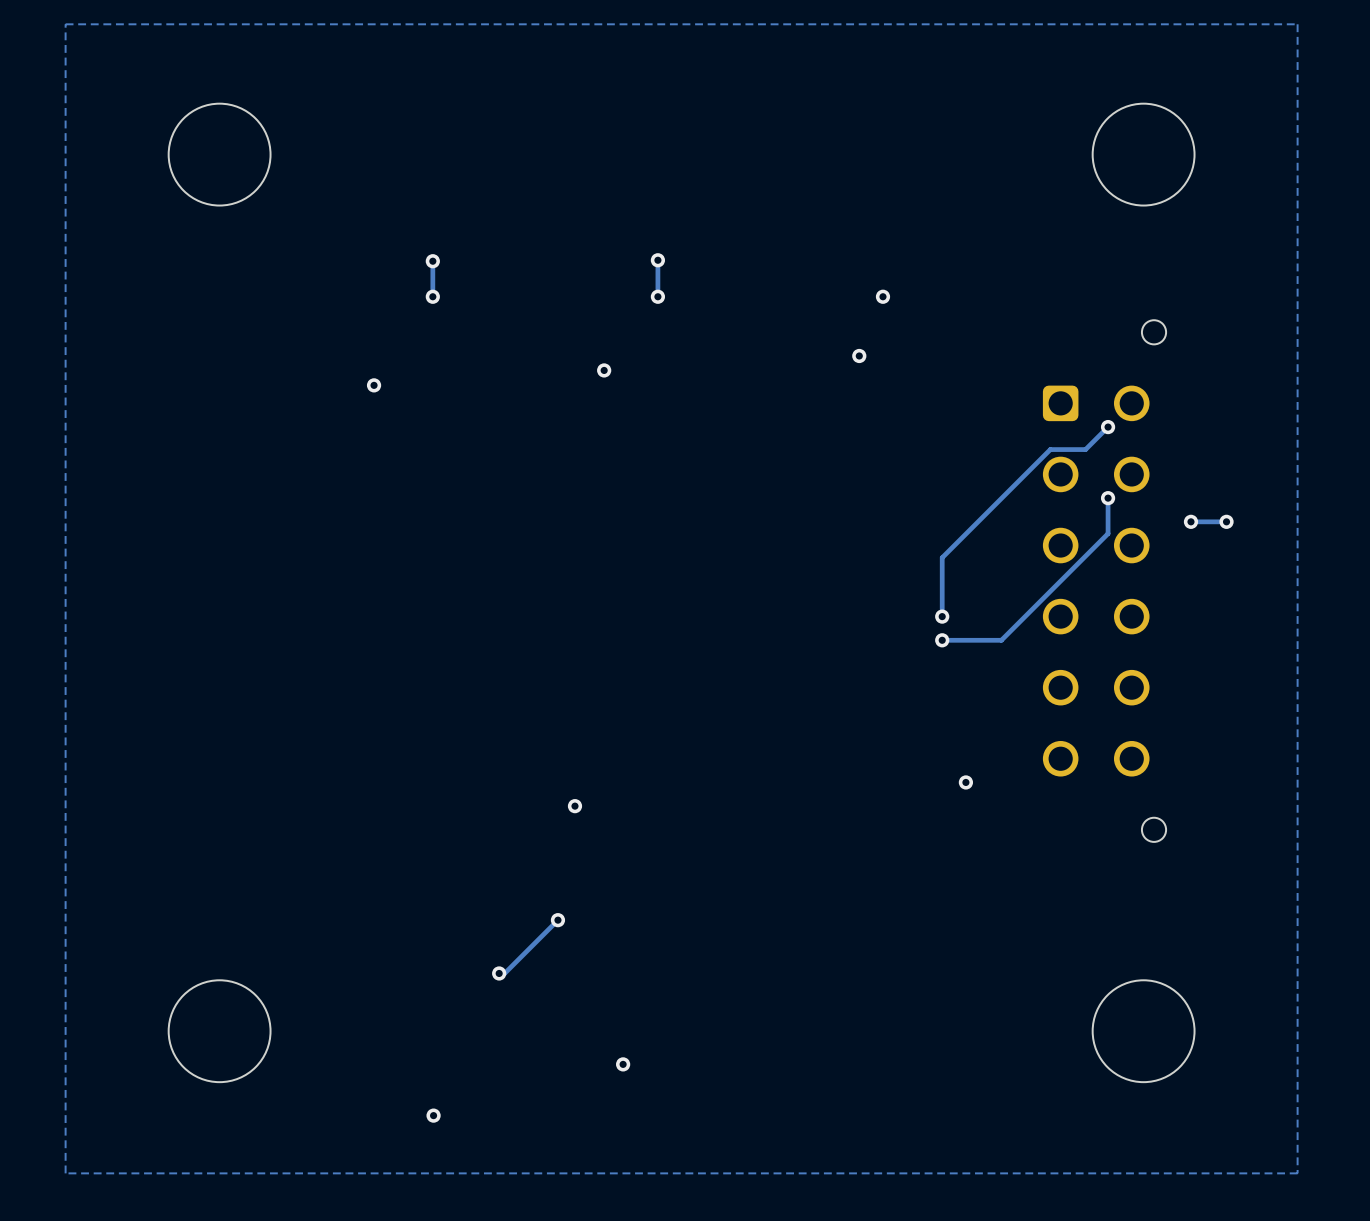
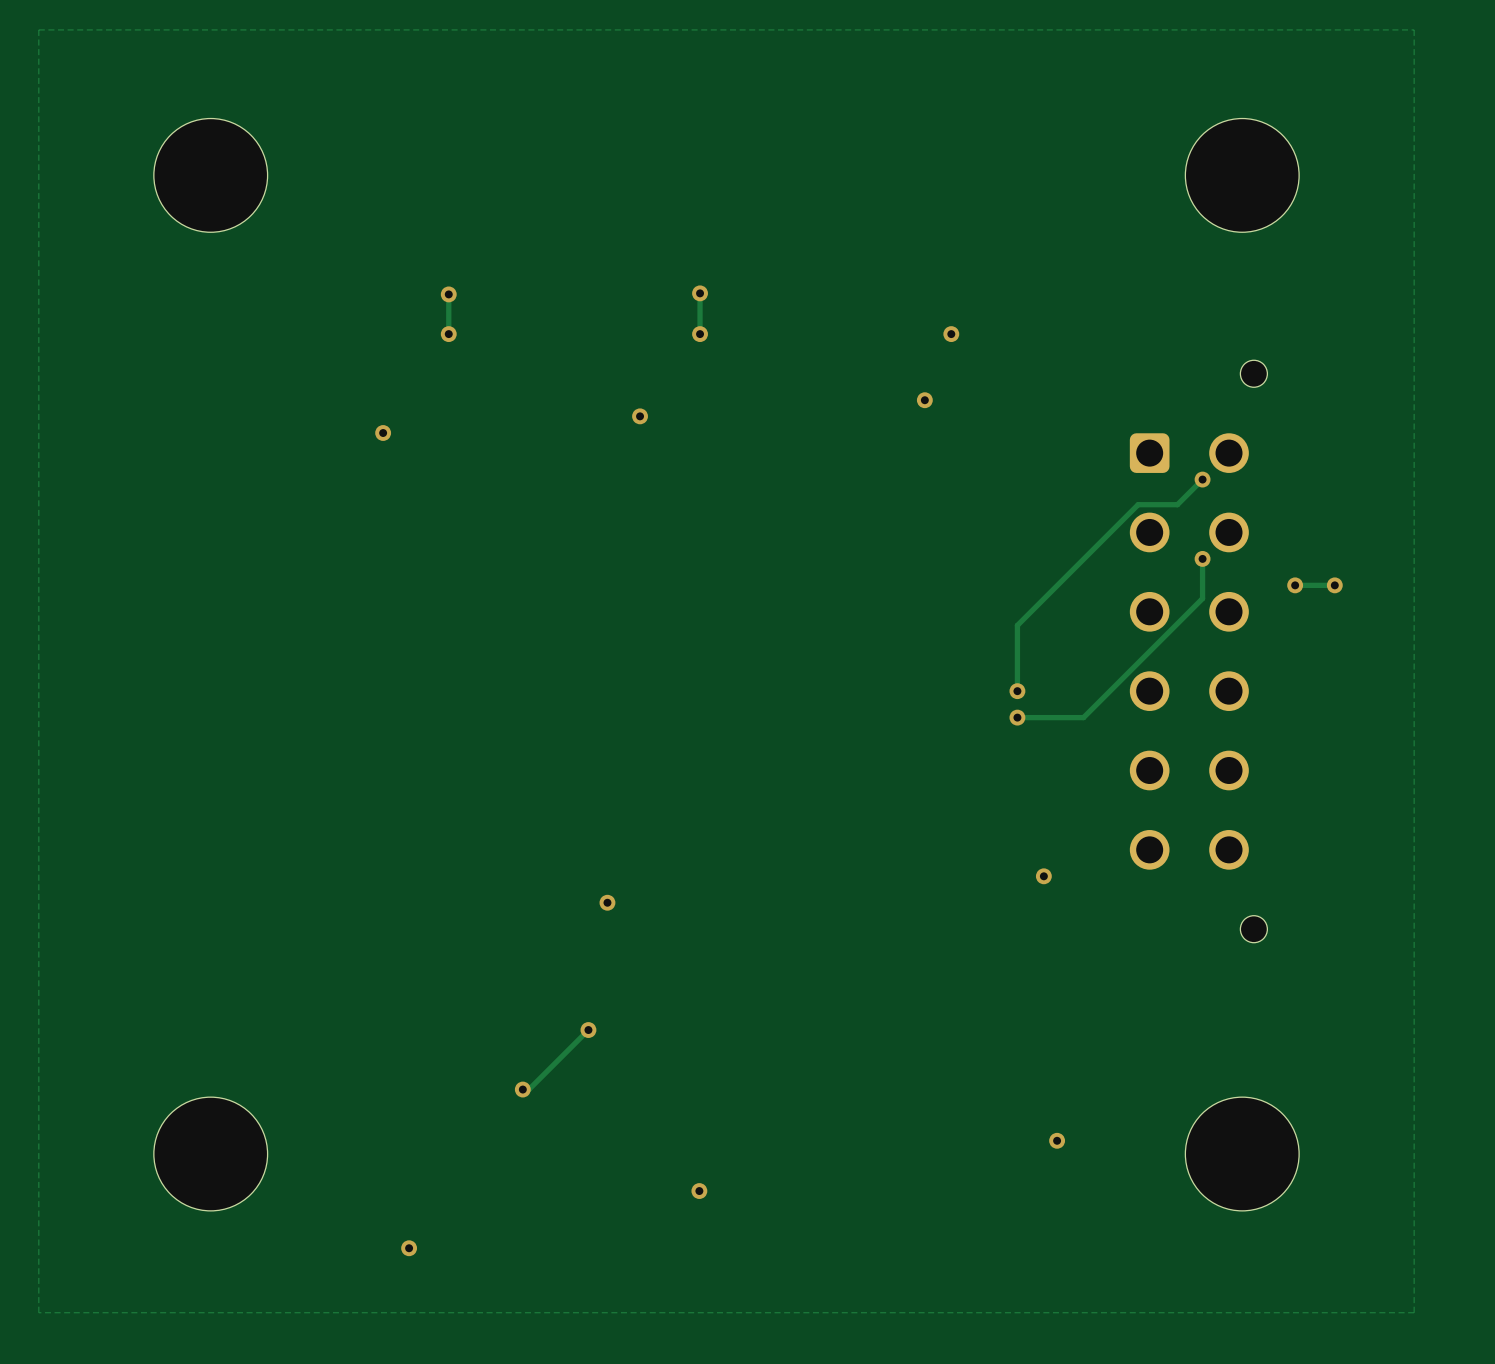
via: none -> (1057, 1140)
via position: (623, 1064) -> (699, 1191)
via position: (433, 1115) -> (409, 1248)

